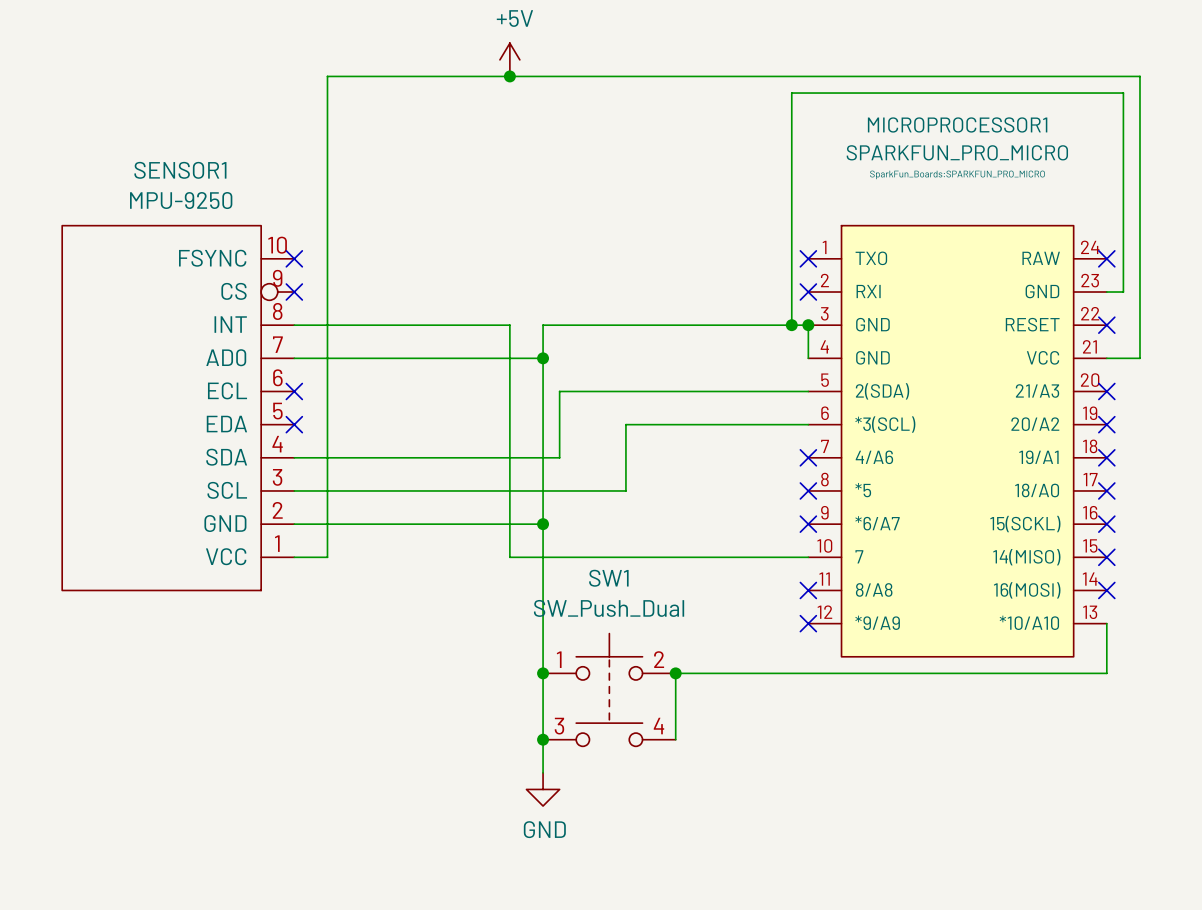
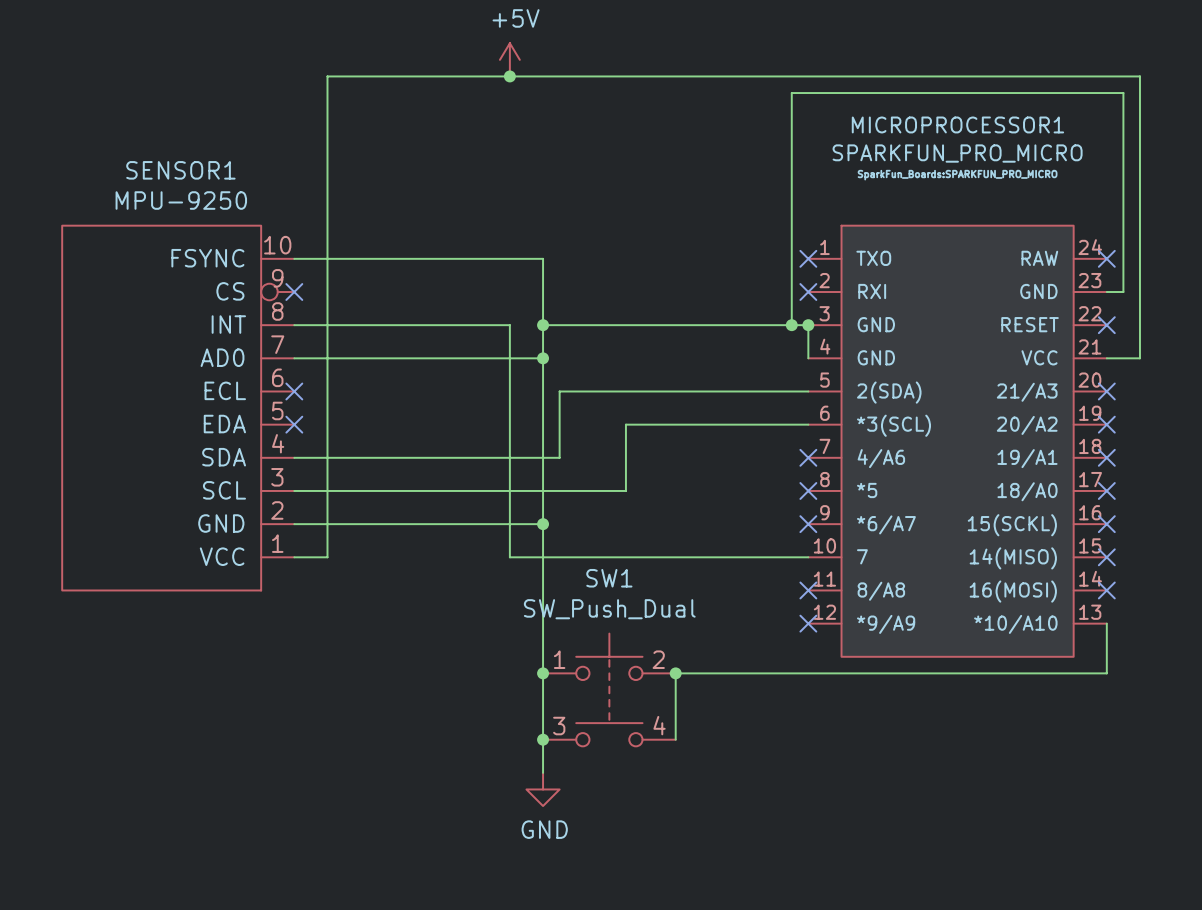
wire: none -> (294, 258) (543, 258) (543, 325)
no-connect mark: (294, 258) -> none
junction: none -> (543, 325)

